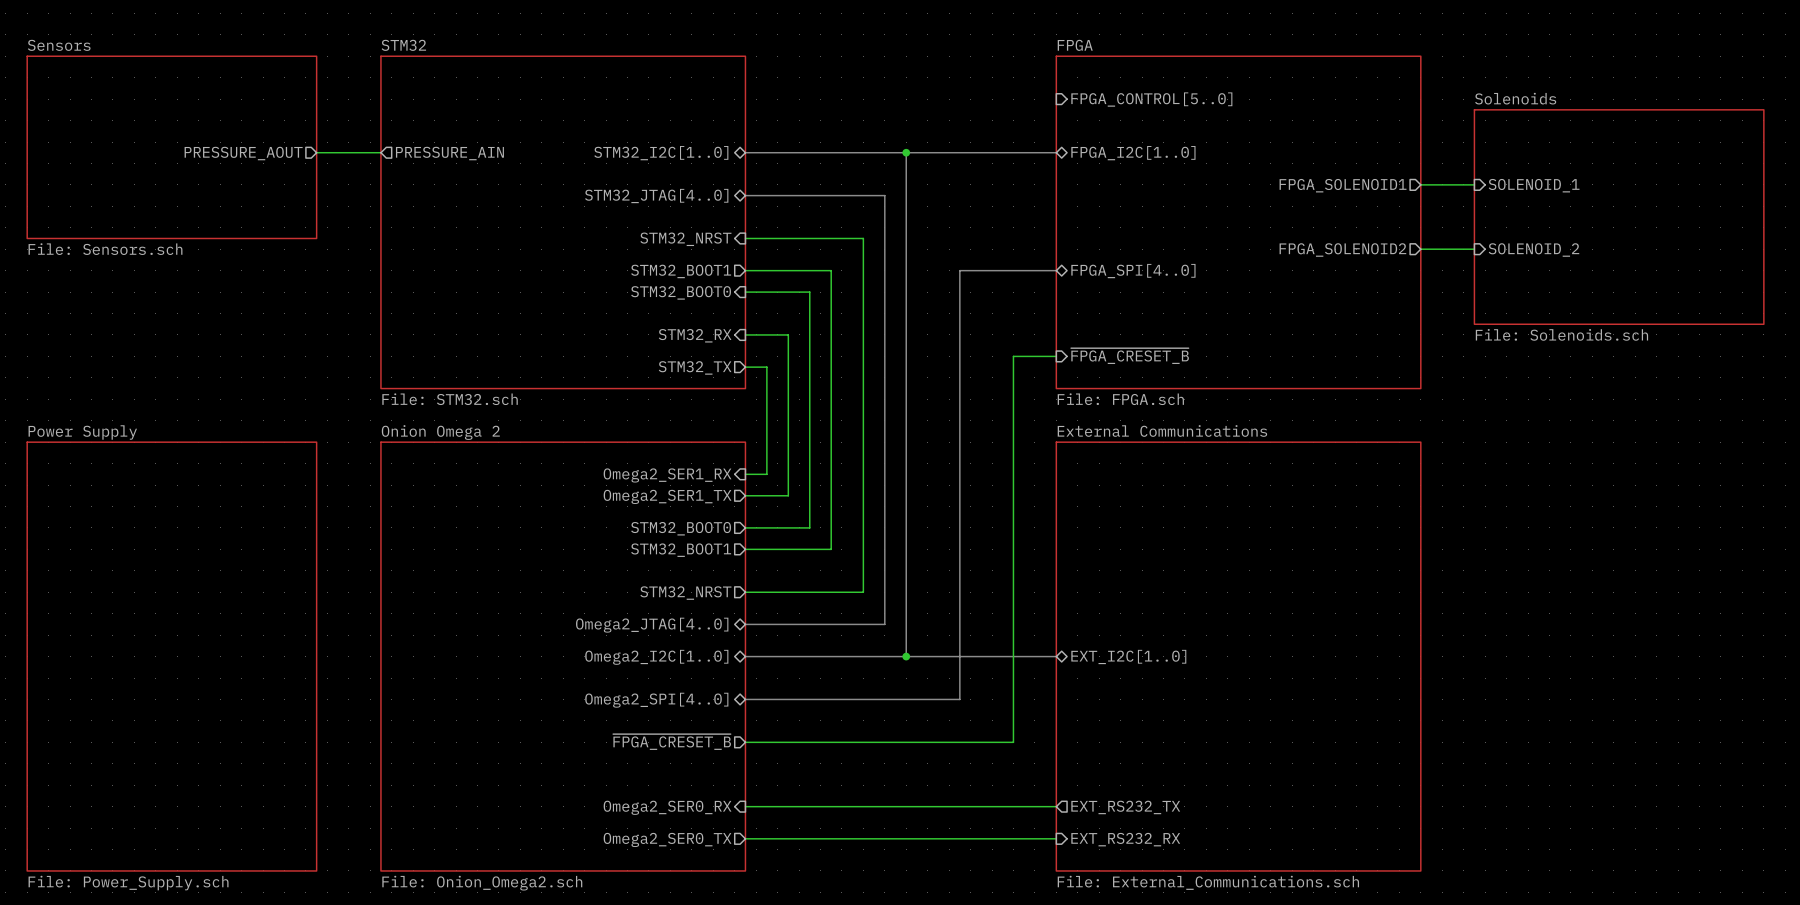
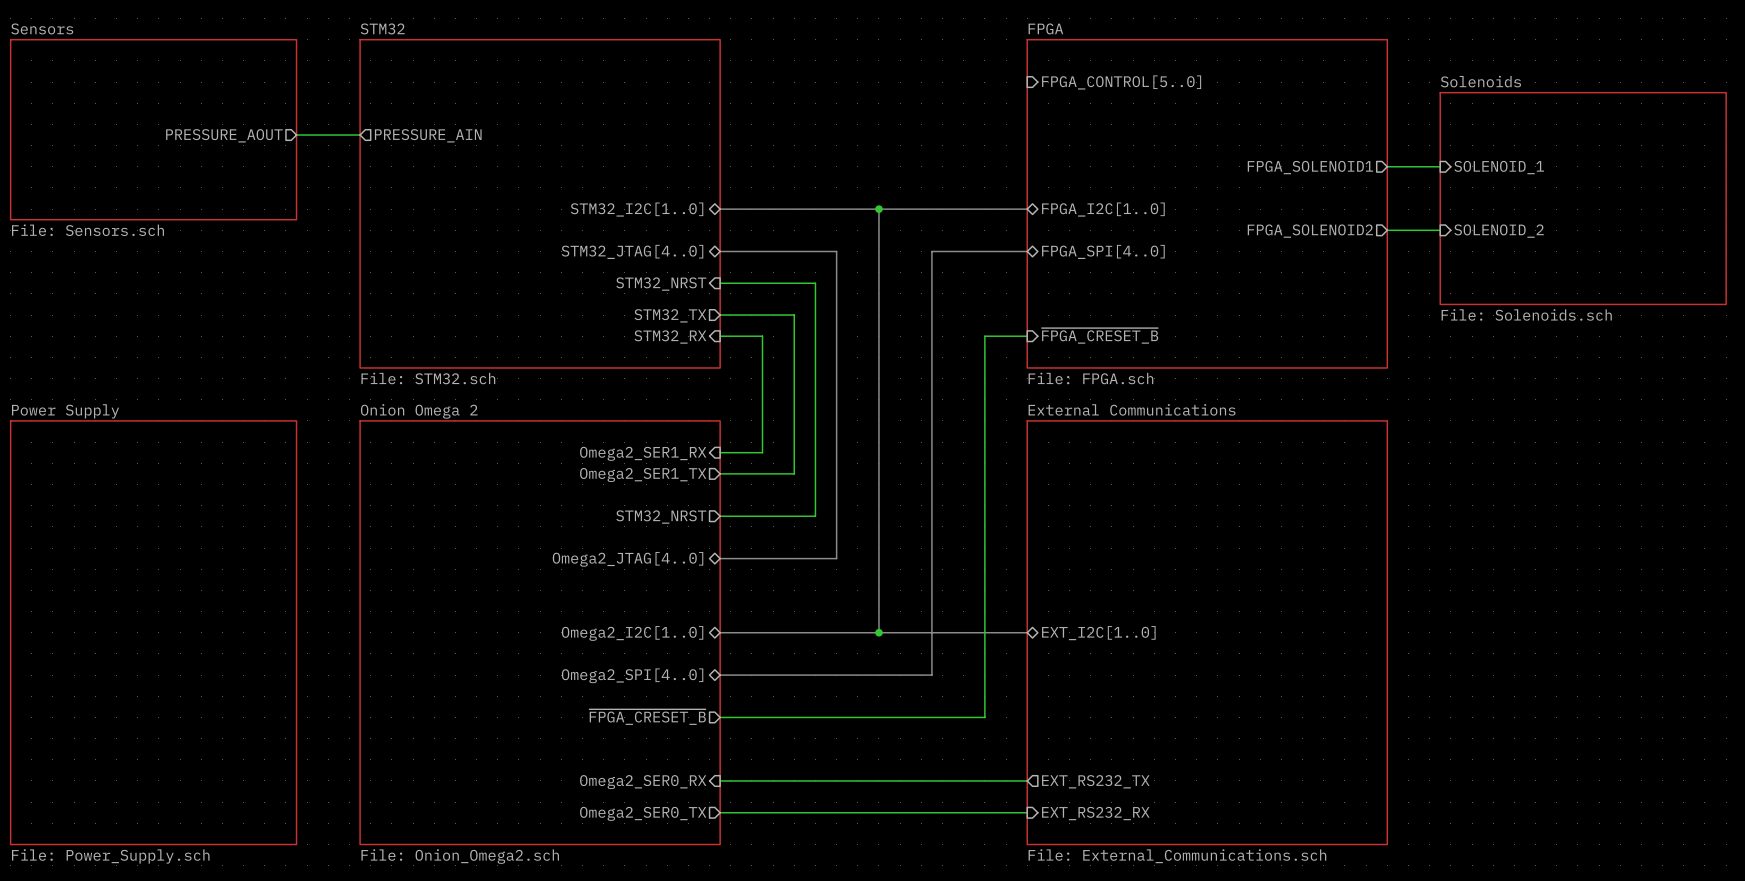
bus: (745, 152) (1056, 152) -> (720, 209) (1027, 209)
bus: (906, 152) (906, 227) -> none
junction: (906, 152) -> none
sheet pin position: STM32_I2C[1..0] (661, 153) -> STM32_I2C[1..0] (637, 209)
sheet pin position: FPGA_I2C[1..0] (1133, 153) -> FPGA_I2C[1..0] (1103, 209)
bus: (745, 195) (884, 195) (884, 624) (745, 624) -> none
sheet pin: STM32_JTAG[4..0] (656, 196) -> none
junction: none -> (878, 209)
wire: (745, 238) (863, 238) (863, 592) (745, 592) -> none
sheet pin position: STM32_NRST (685, 239) -> STM32_NRST (661, 284)
bus: none -> (720, 251) (836, 251) (836, 558) (720, 558)
wire: (745, 270) (831, 270) (831, 549) (745, 549) -> none
sheet pin shape: output (681, 271) -> bidirectional (632, 251)
sheet pin: STM32_BOOT1 (681, 271) -> STM32_JTAG[4..0] (632, 251)
sheet pin: STM32_BOOT0 (681, 292) -> none
wire: (745, 292) (809, 292) (809, 527) (745, 527) -> none
wire: none -> (720, 283) (815, 283) (815, 516) (720, 516)
wire: (788, 334) (788, 356) -> (720, 336) (762, 336)
wire: none -> (762, 315) (794, 315) (794, 473) (762, 473)
sheet pin shape: input (695, 335) -> output (670, 315)
sheet pin: STM32_RX (695, 335) -> STM32_TX (670, 315)
sheet pin shape: output (695, 367) -> input (670, 337)
sheet pin: STM32_TX (695, 367) -> STM32_RX (670, 337)
wire: (745, 367) (766, 367) (766, 474) -> none
wire: (788, 474) (788, 495) -> (762, 452) (741, 452)
sheet pin: STM32_BOOT0 (681, 528) -> none
sheet pin: STM32_BOOT1 (681, 550) -> none
sheet pin position: STM32_NRST (685, 593) -> STM32_NRST (661, 517)
sheet pin position: Omega2_JTAG[4..0] (652, 625) -> Omega2_JTAG[4..0] (628, 559)

